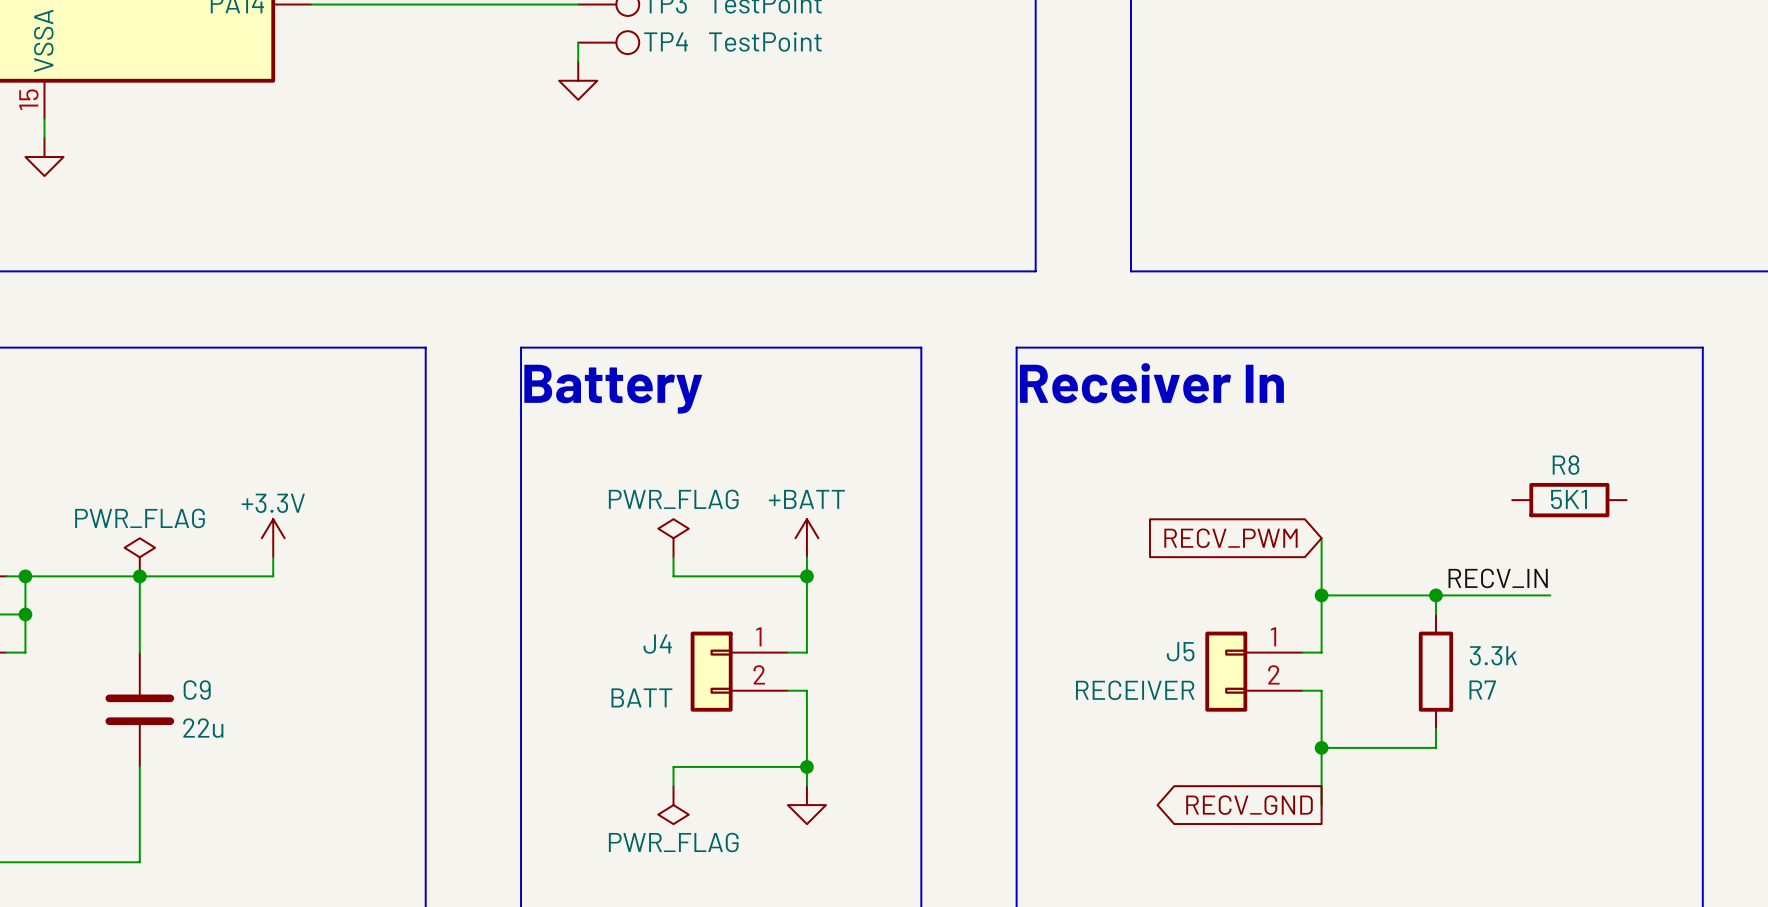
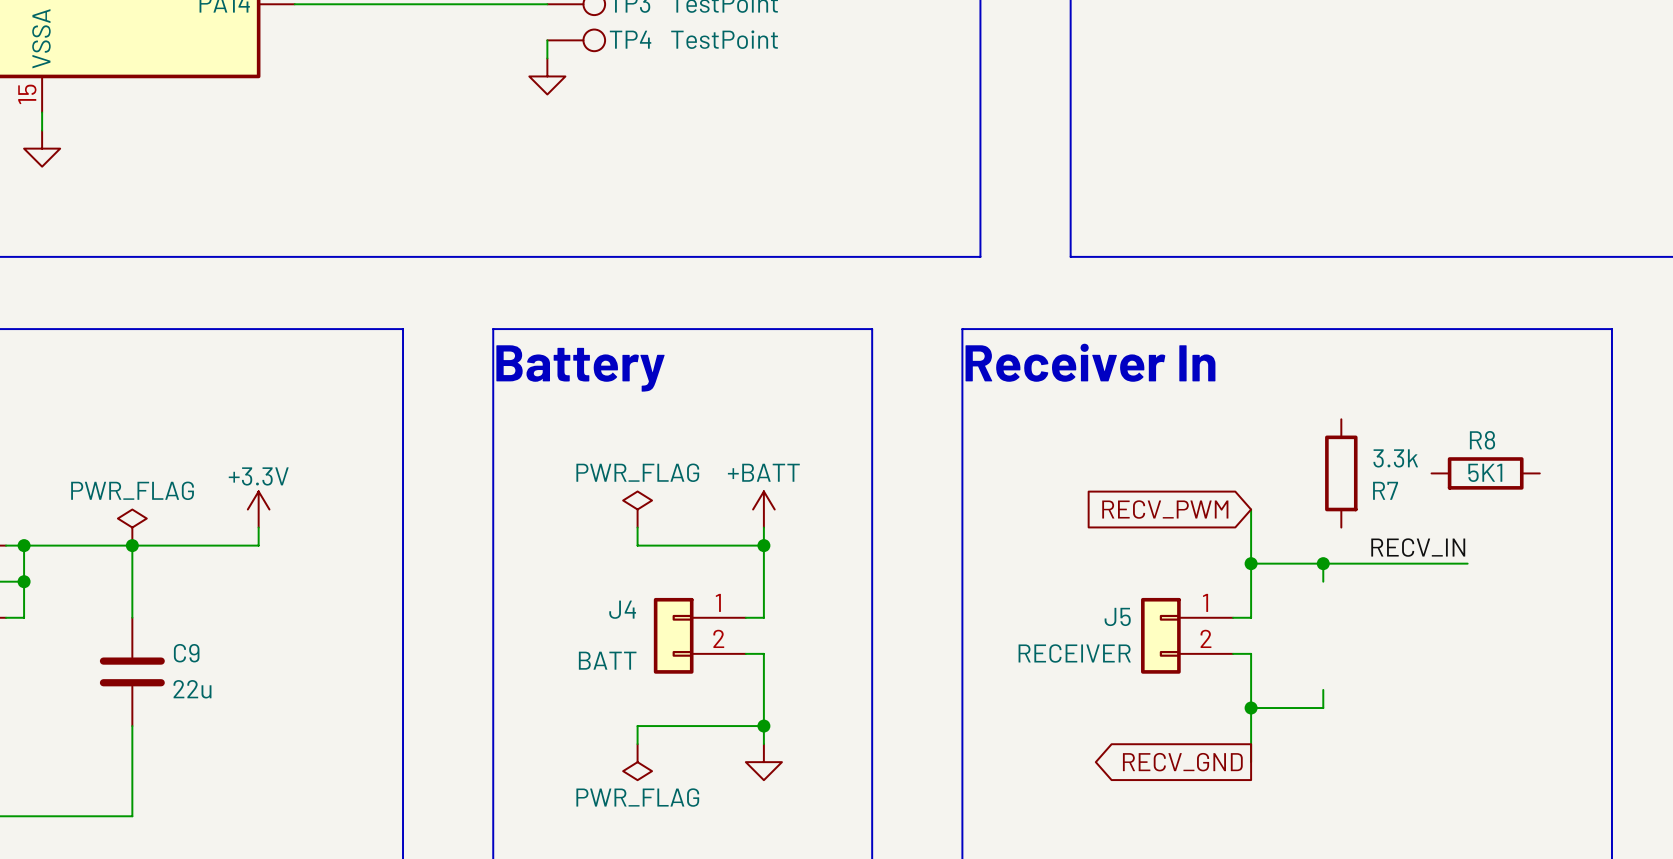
wire: (1435, 595) (1435, 614) -> (1323, 563) (1323, 581)
junction position: (1435, 595) -> (1323, 563)
R7 position: (1435, 671) -> (1341, 473)
wire: (1435, 728) (1435, 747) (1397, 747) -> (1323, 689) (1323, 708)

